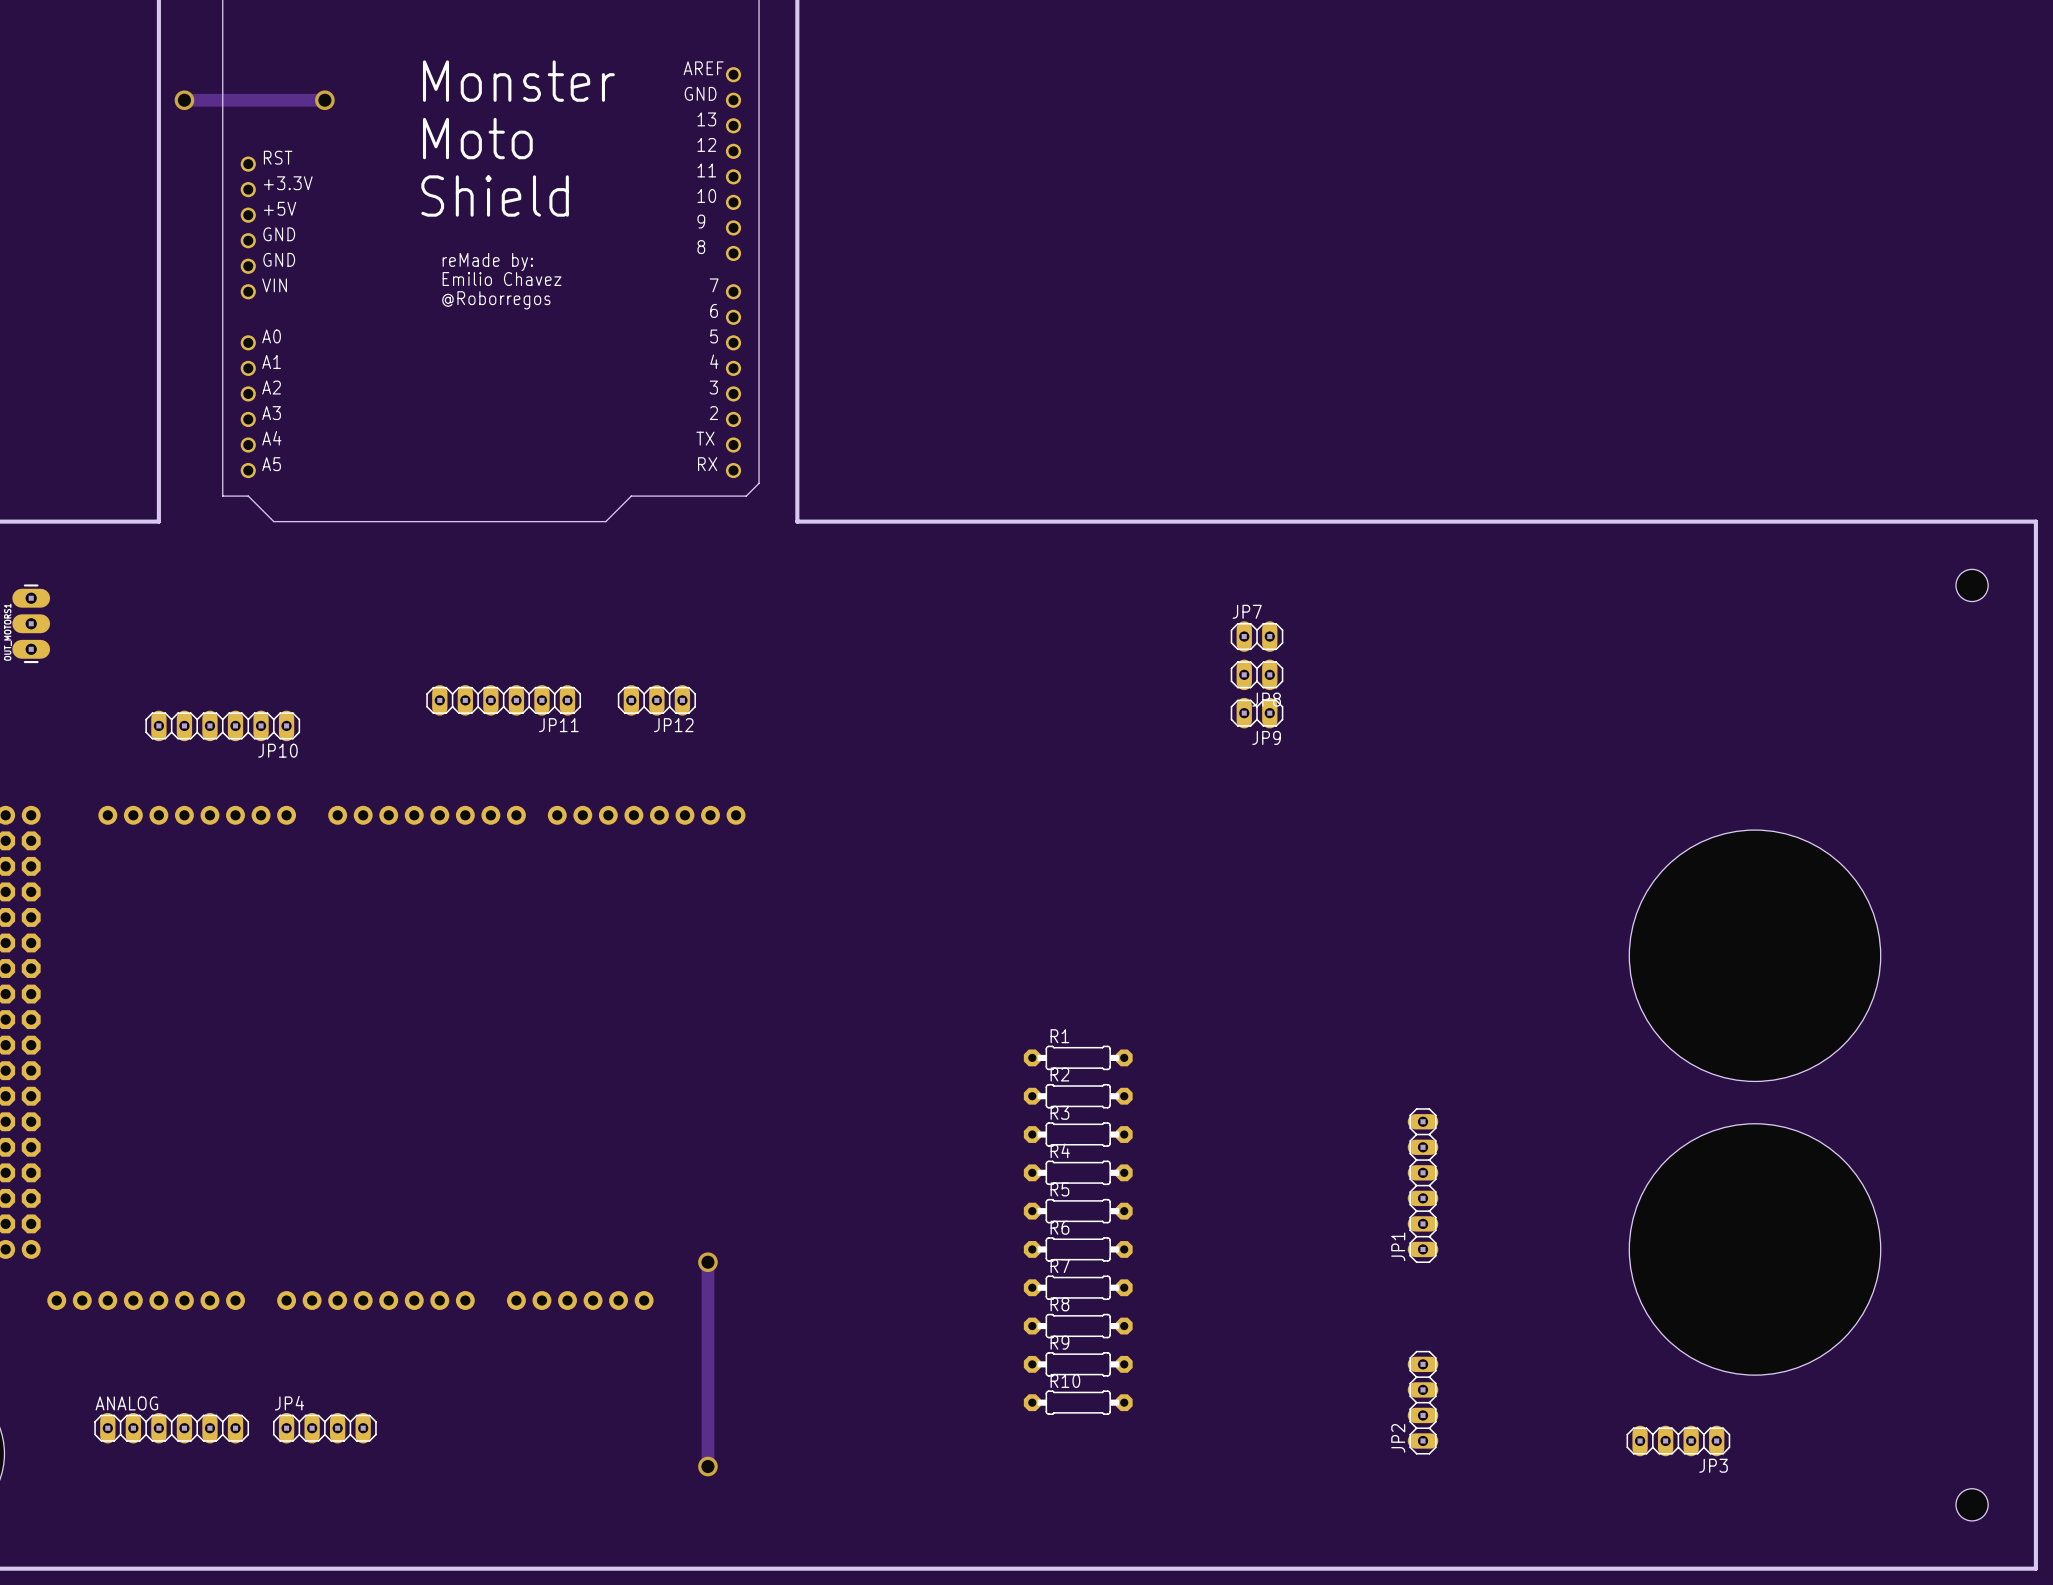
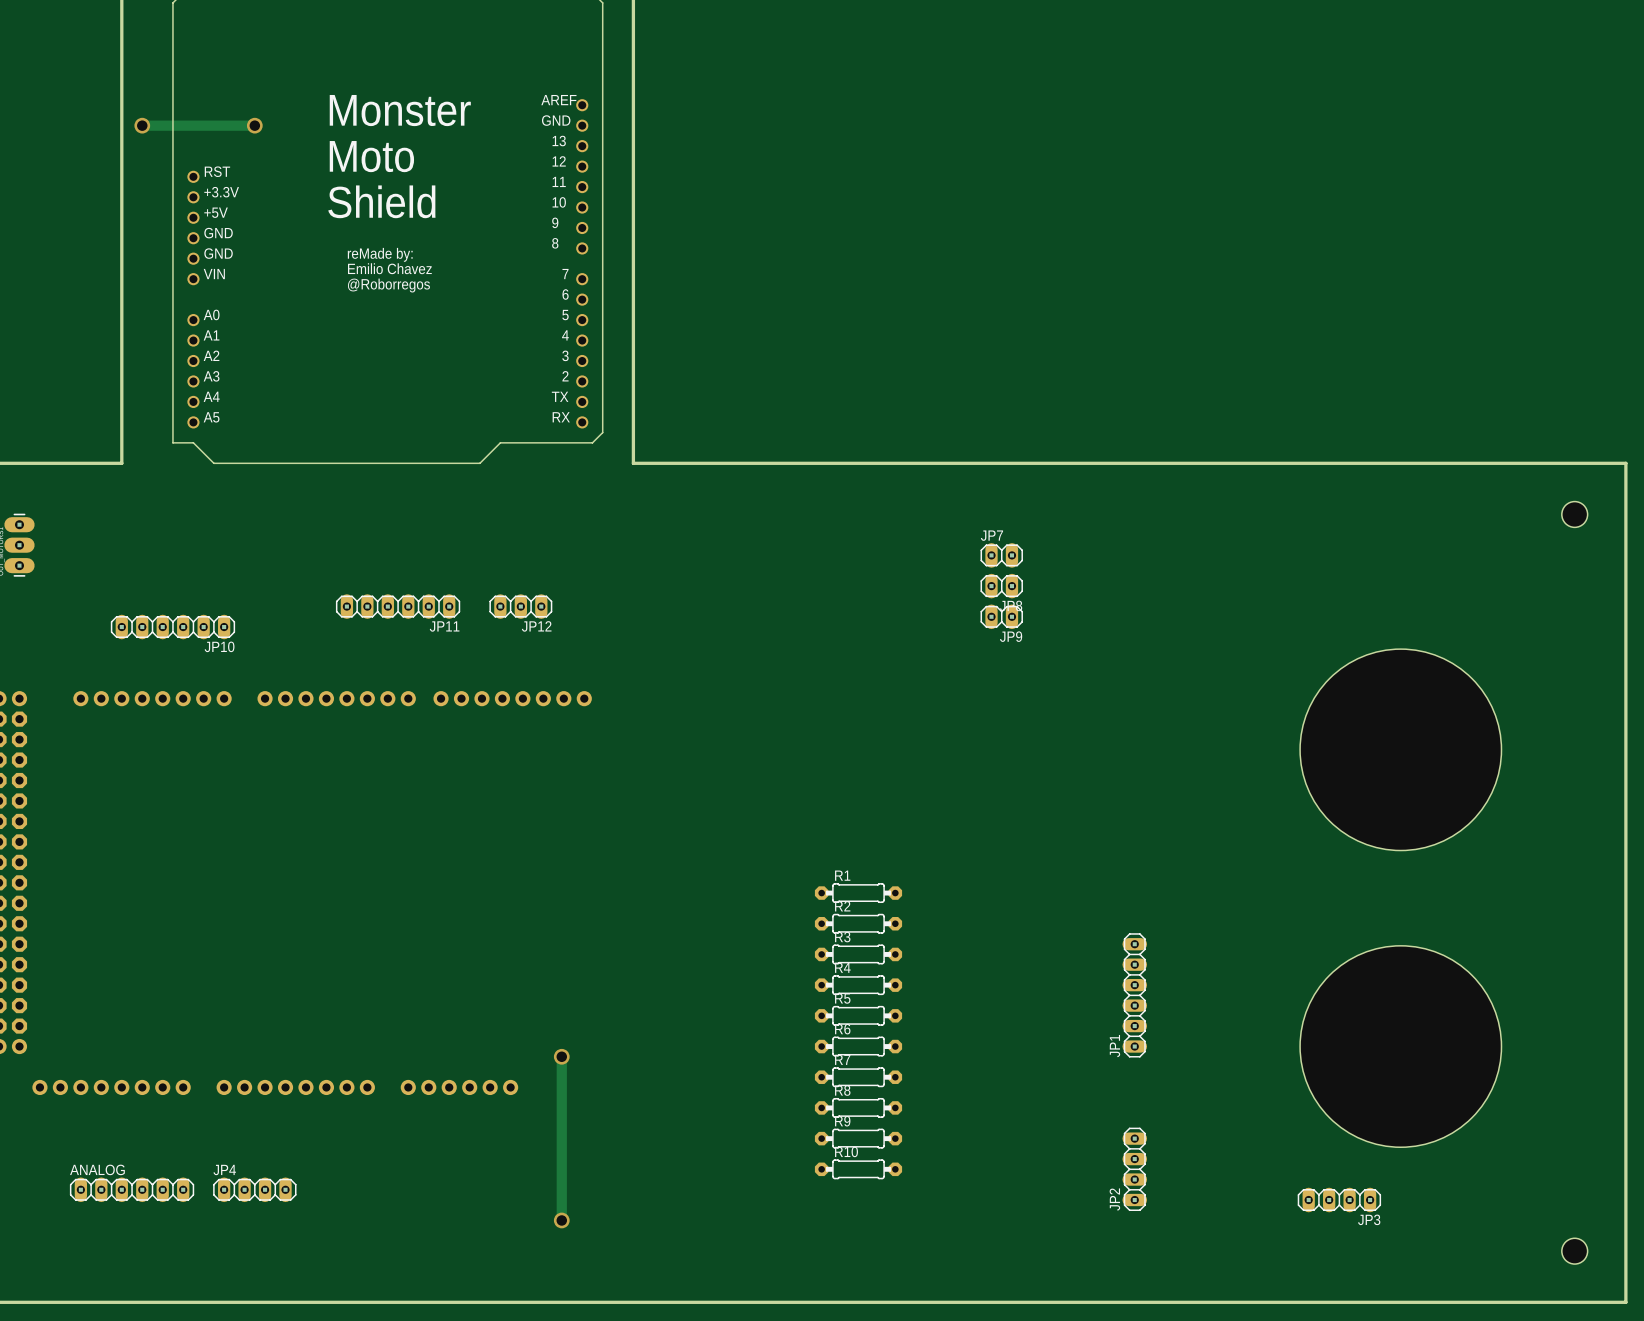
hole position: (1755, 955) -> (1400, 749)

